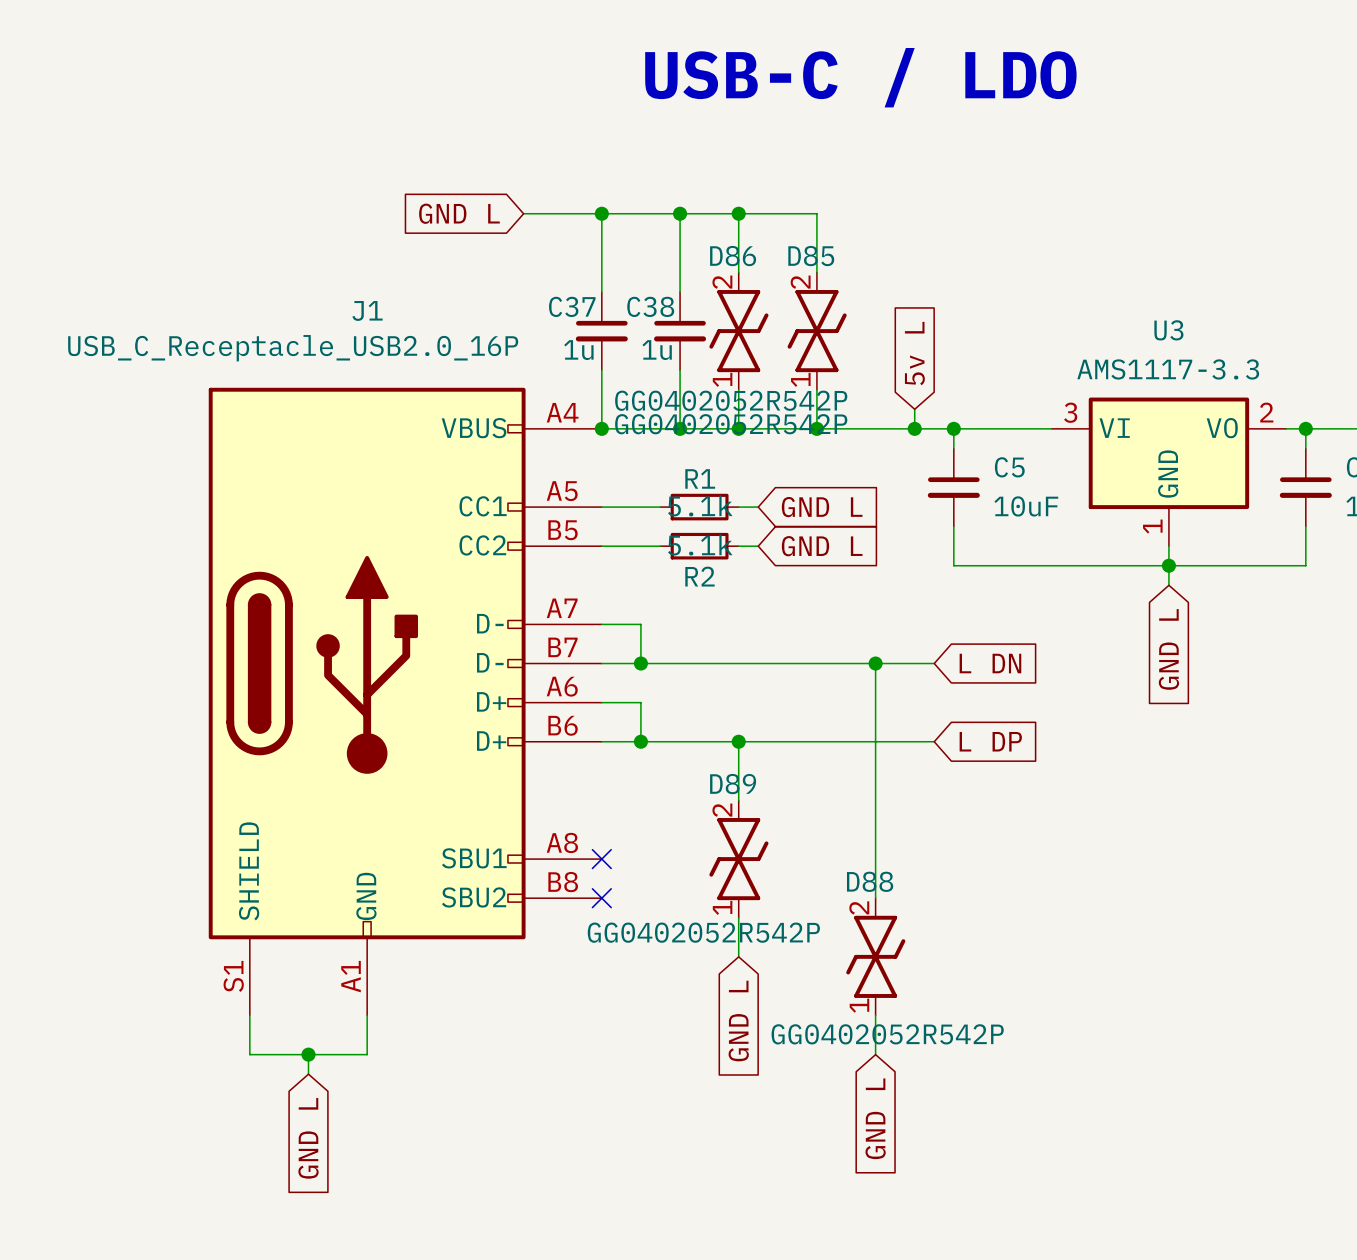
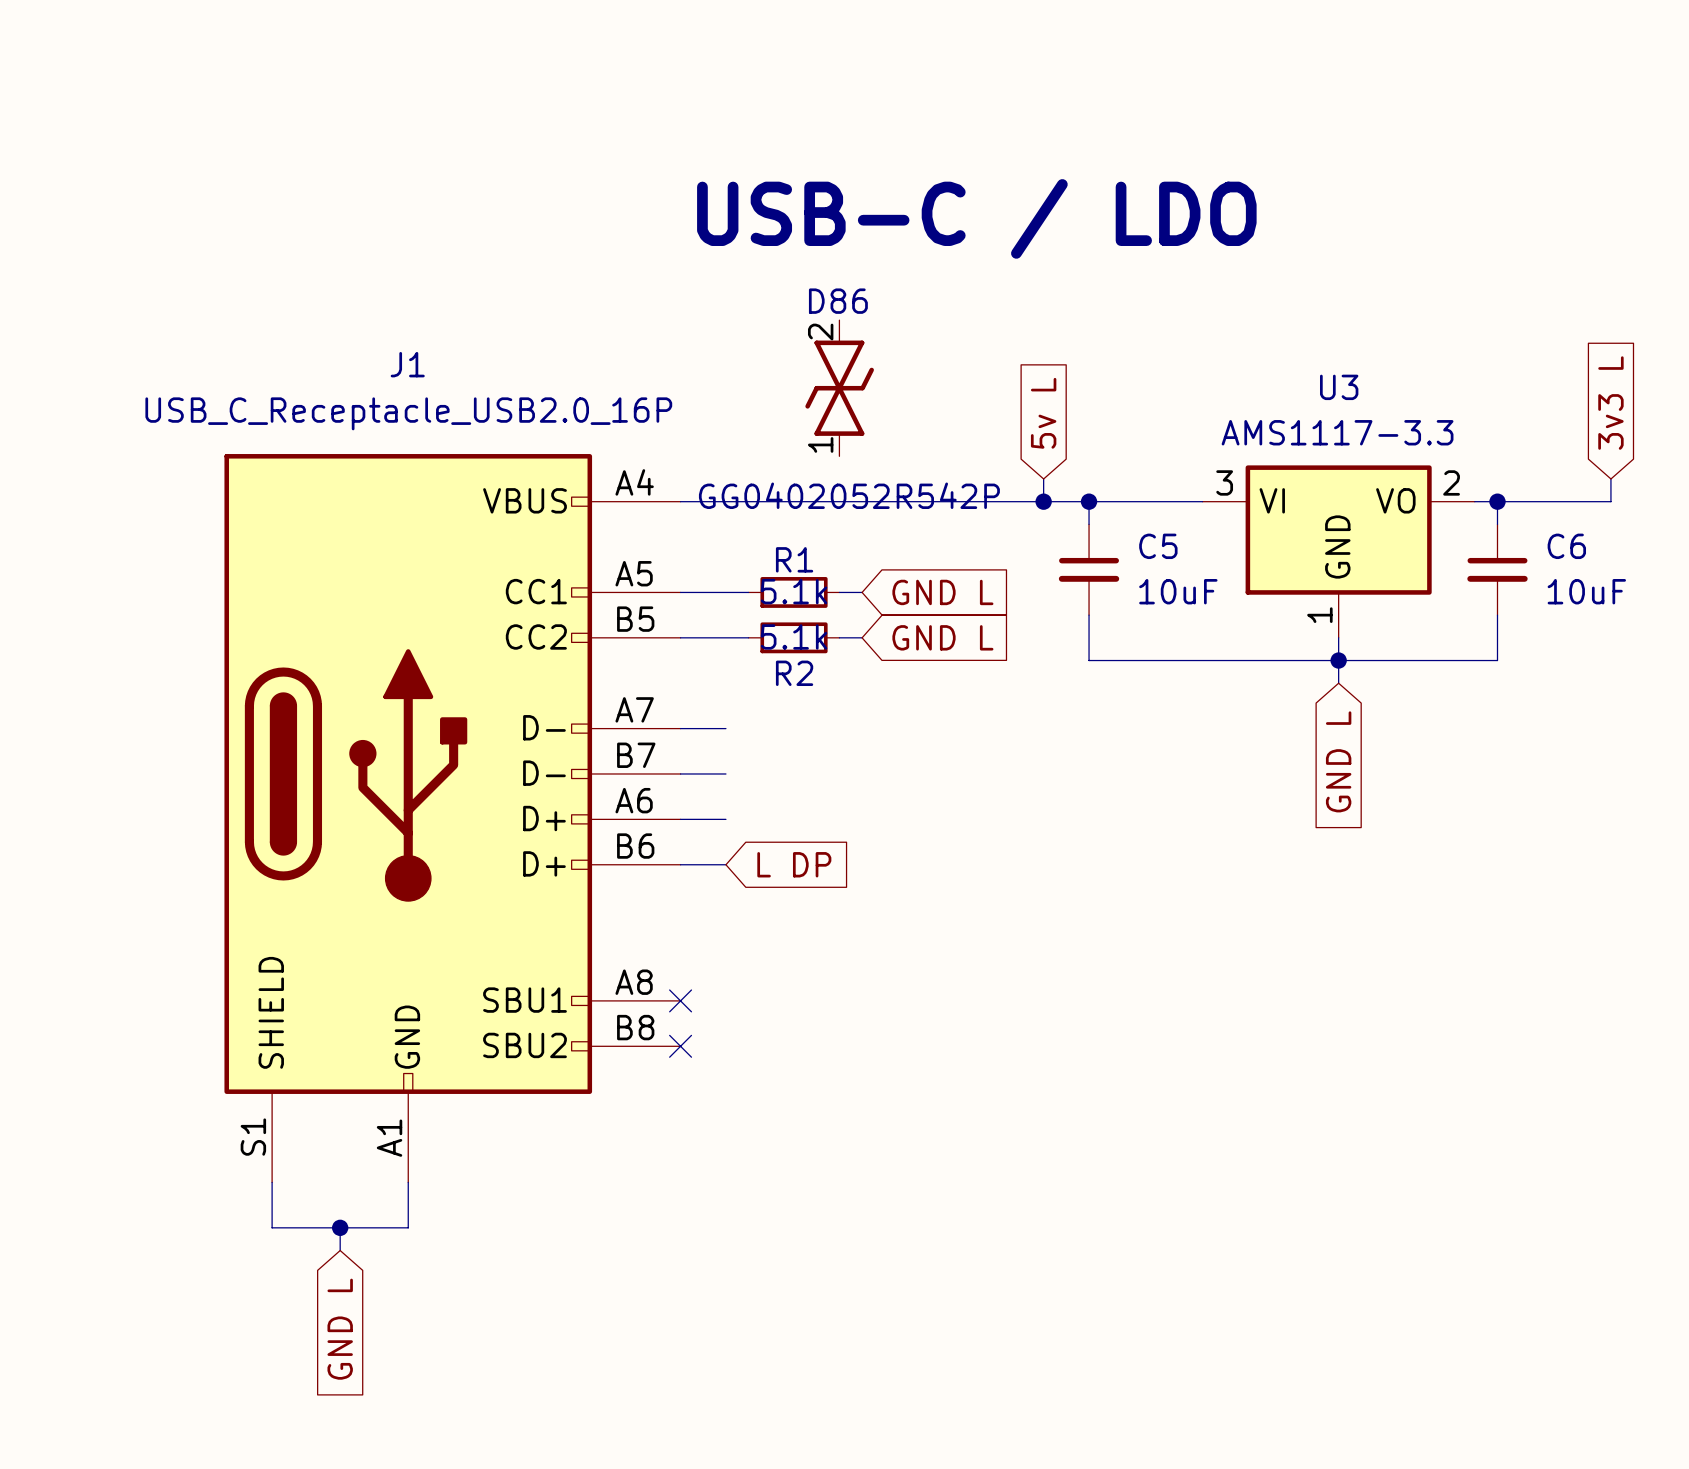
text position: USB-C / LDO (860, 77) -> USB-C / LDO (976, 218)
global label: GND L (459, 213) -> none
wire: (523, 213) (816, 213) (816, 272) -> none
wire: (601, 213) (601, 291) -> none
junction: (601, 213) -> none
wire: (680, 213) (680, 291) -> none
junction: (680, 213) -> none
wire: (738, 213) (738, 272) -> none
junction: (738, 213) -> none
C37: 1u (601, 331) -> none
C38: 1u (680, 331) -> none
D85: GG0402052R542P (817, 331) -> none
J1 value position: USB_C_Receptacle_USB2.0_16P (293, 348) -> USB_C_Receptacle_USB2.0_16P (408, 413)
wire: (601, 370) (601, 428) -> none
wire: (680, 370) (680, 428) -> none
wire: (738, 389) (738, 428) -> none
wire: (816, 389) (816, 428) -> none
junction: (601, 428) -> none
junction: (680, 428) -> none
junction: (738, 428) -> none
junction: (816, 428) -> none
wire: (640, 624) (640, 663) (934, 663) -> none
junction: (640, 663) -> none
wire: (875, 663) (875, 898) -> none
junction: (875, 663) -> none
global label: L DN (990, 663) -> none
wire: (640, 702) (640, 741) (934, 741) -> none
junction: (640, 741) -> none
wire: (738, 741) (738, 800) -> none
junction: (738, 741) -> none
global label position: L DP (990, 741) -> L DP (794, 864)
D89: GG0402052R542P (738, 859) -> none
wire: (738, 917) (738, 956) -> none
D88: GG0402052R542P (875, 956) -> none
wire: (875, 1015) (875, 1054) -> none
global label: GND L (738, 1021) -> none
global label: GND L (875, 1118) -> none

